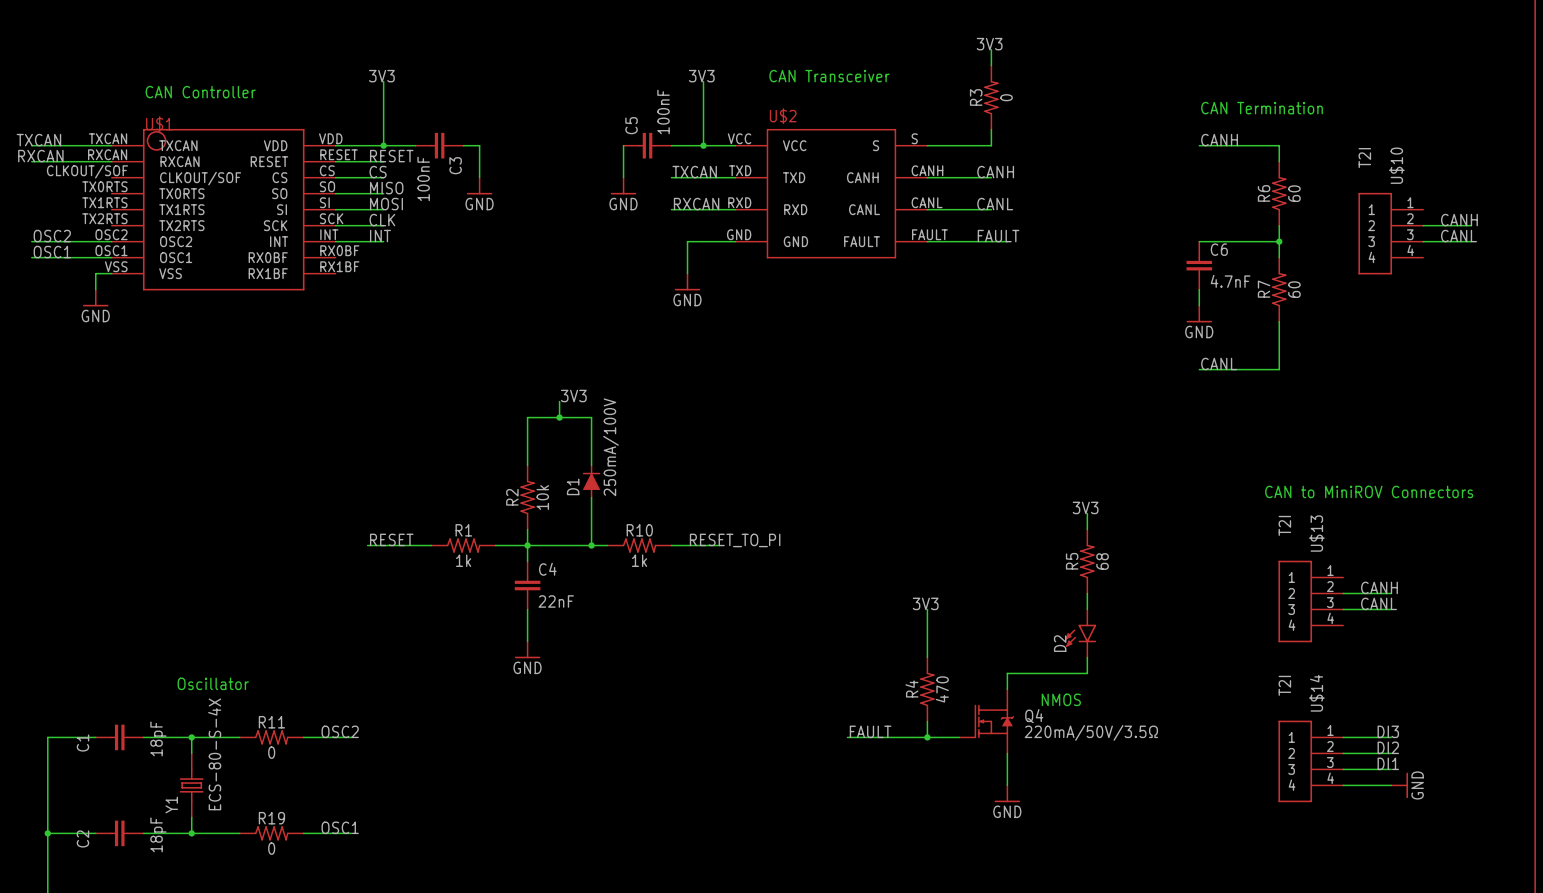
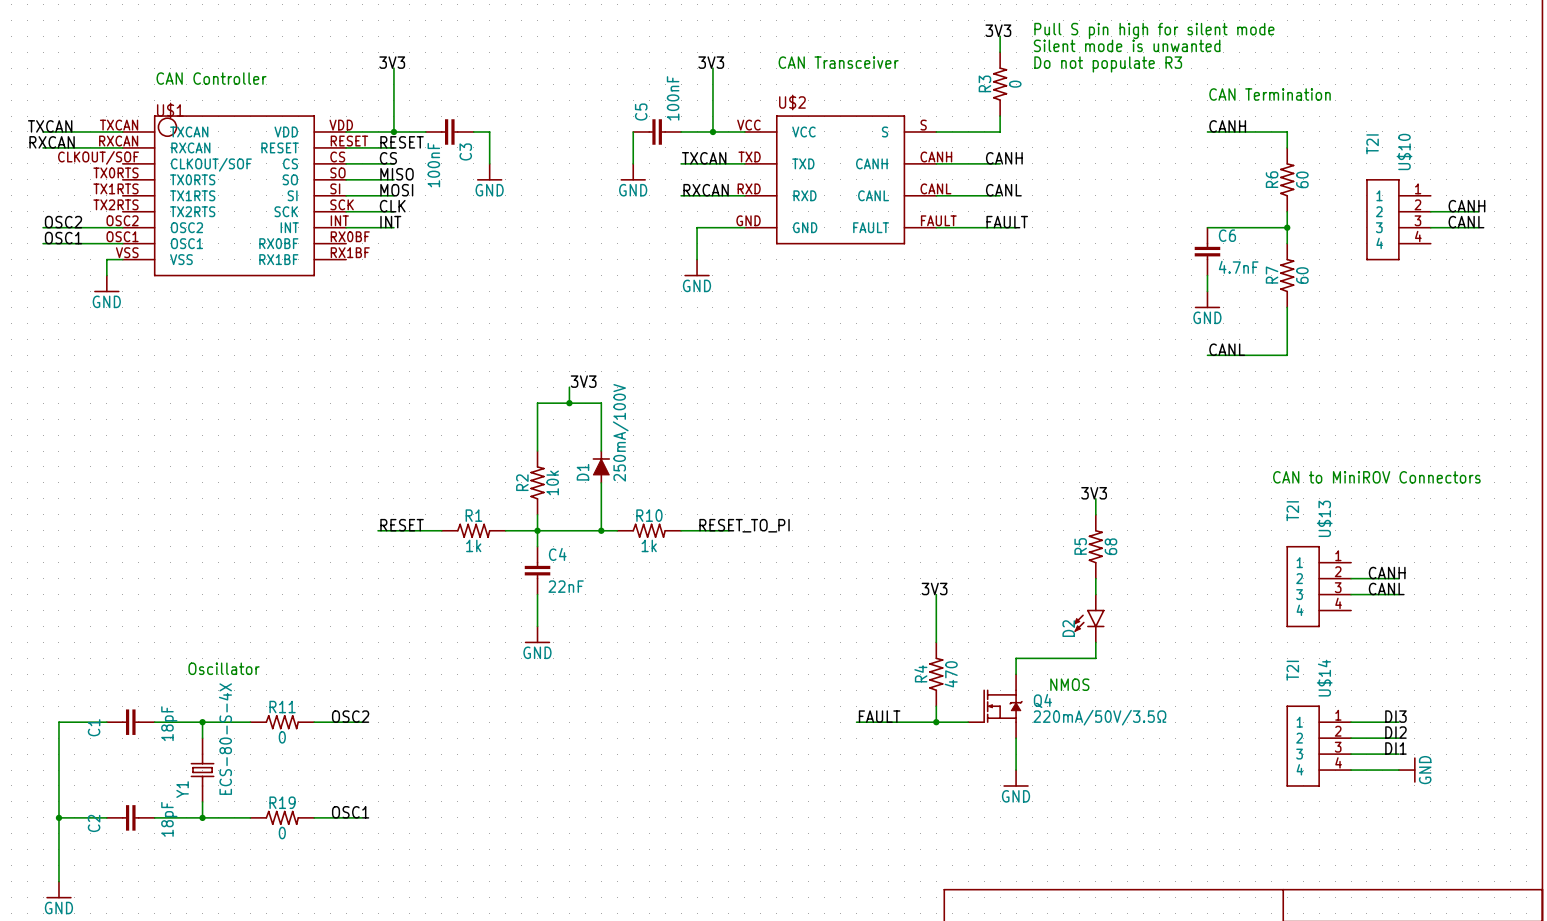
text: none -> Pull S pin high for silent mode (1154, 30)
text: none -> Silent mode is unwanted (1127, 45)
text: none -> Do not populate R3 (1108, 64)

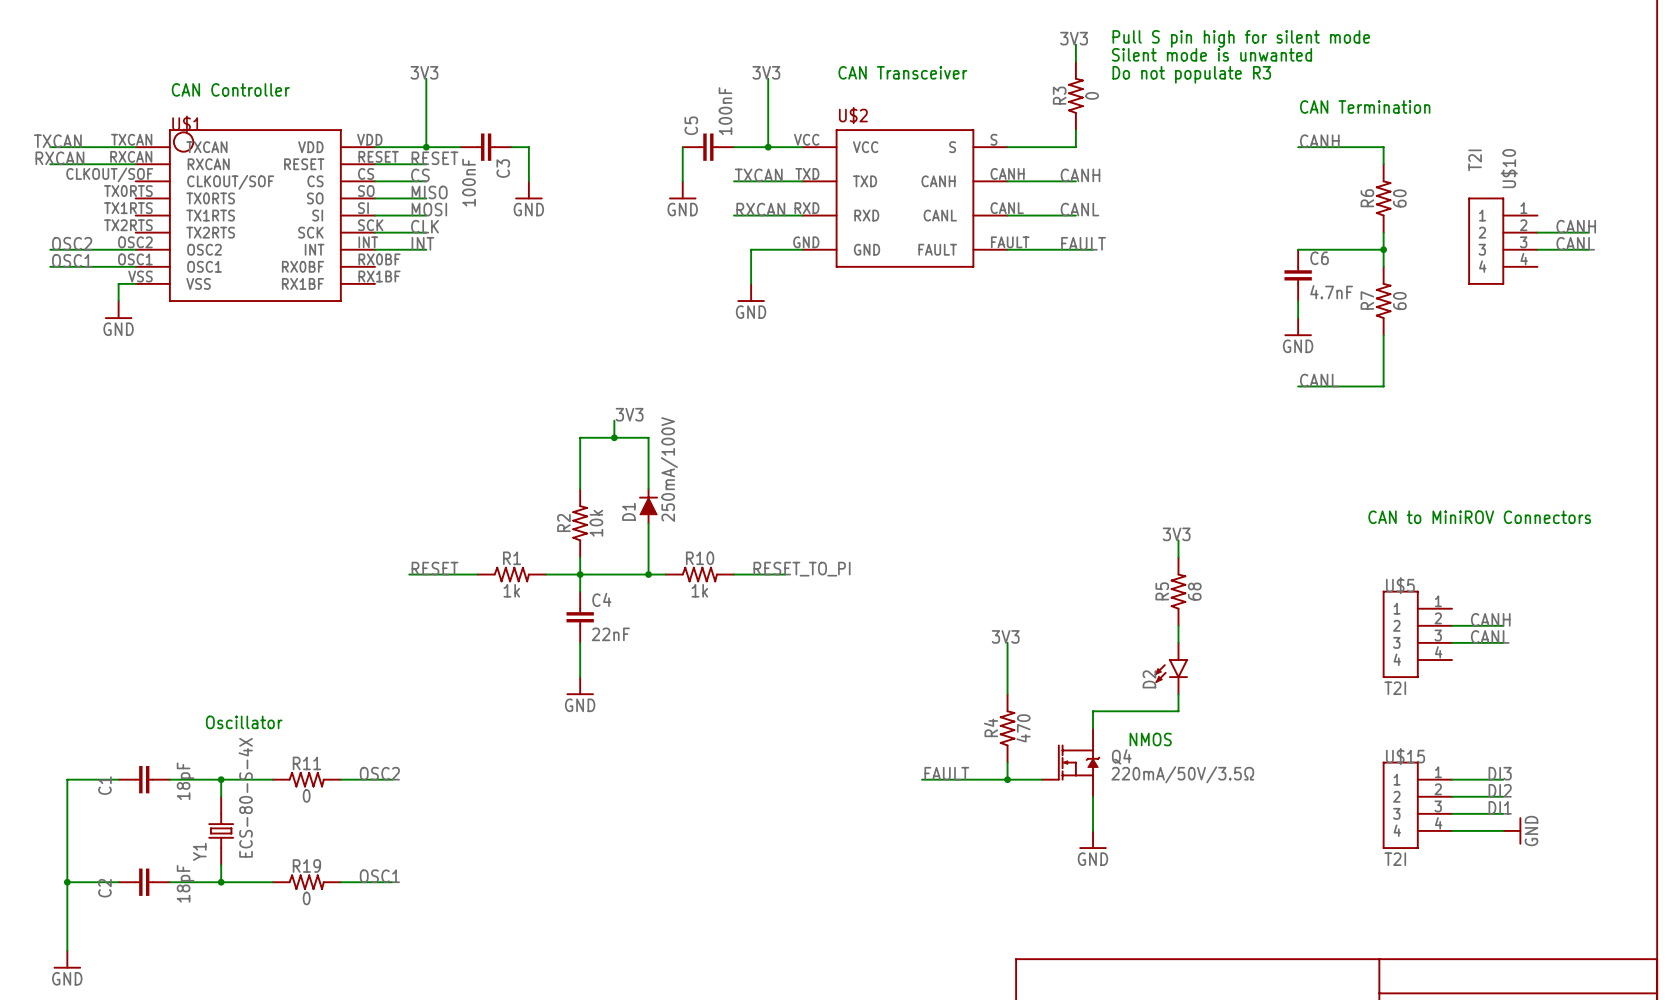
U$13 value rotation: 0° (1292, 511) -> 90° clockwise (1395, 688)
U$13 value position: T2I (1292, 511) -> T2I (1395, 688)
U$13 name: U$13 (1324, 518) -> U$5 (1400, 585)
U$14 value rotation: 0° (1292, 670) -> 90° clockwise (1395, 859)
U$14 value position: T2I (1292, 670) -> T2I (1395, 859)
U$14 name: U$14 (1324, 678) -> U$15 (1405, 756)

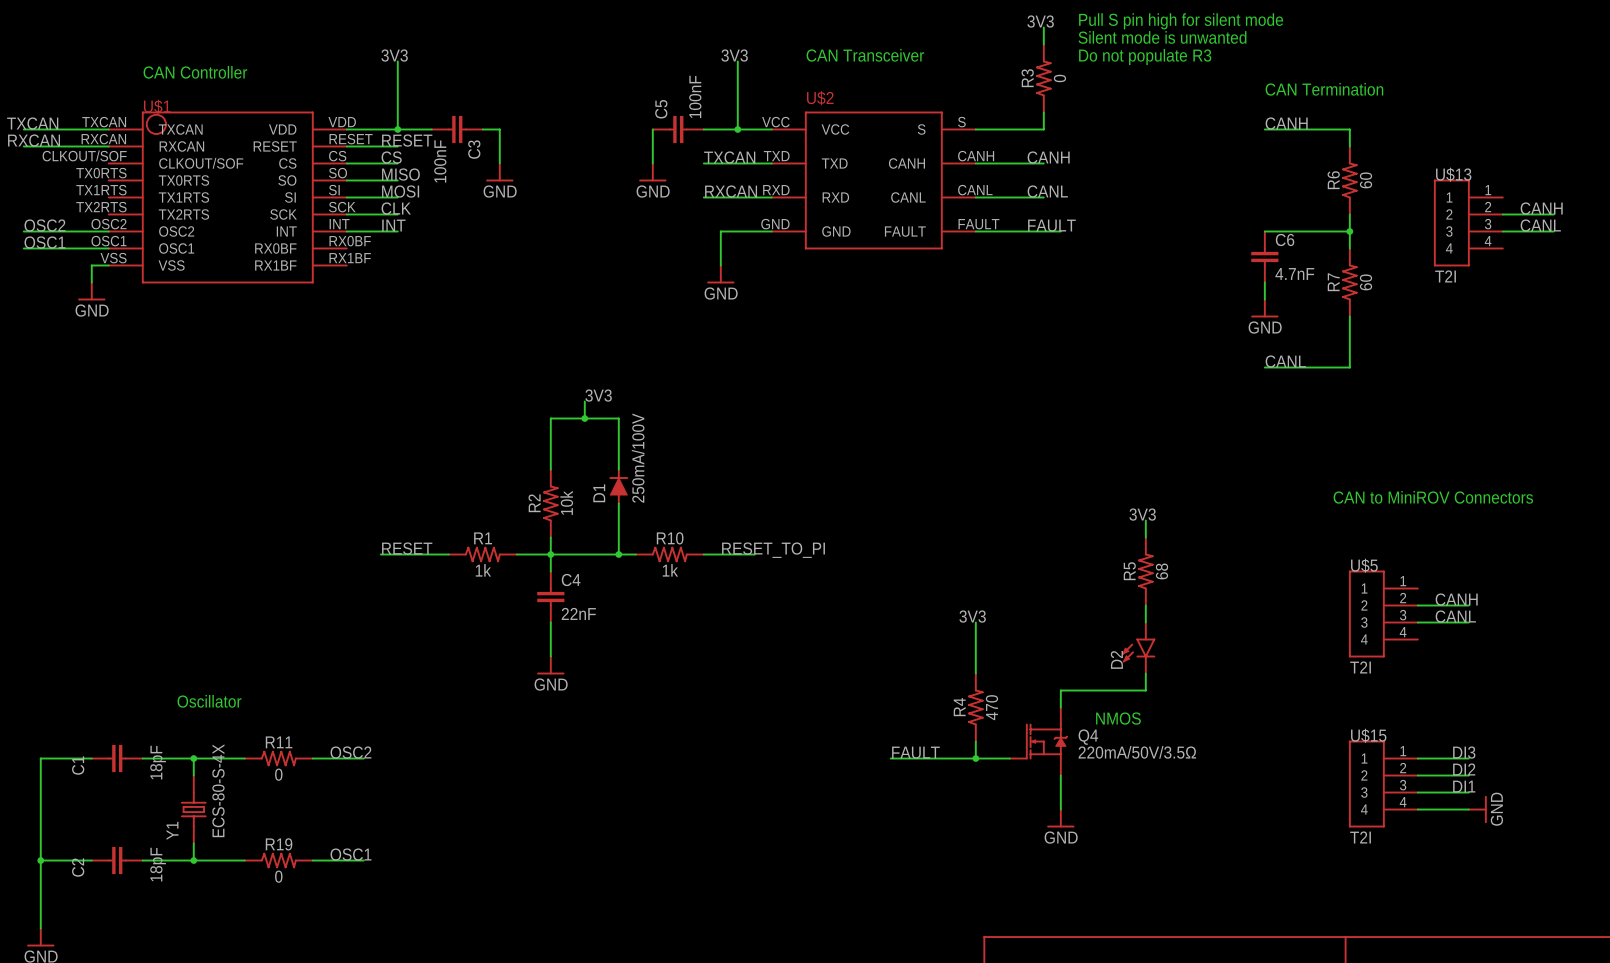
U$10 value rotation: 0° (1475, 160) -> 90° clockwise (1445, 276)
U$10 value position: T2I (1475, 160) -> T2I (1445, 276)
U$10 name: U$10 (1509, 168) -> U$13 (1453, 174)

